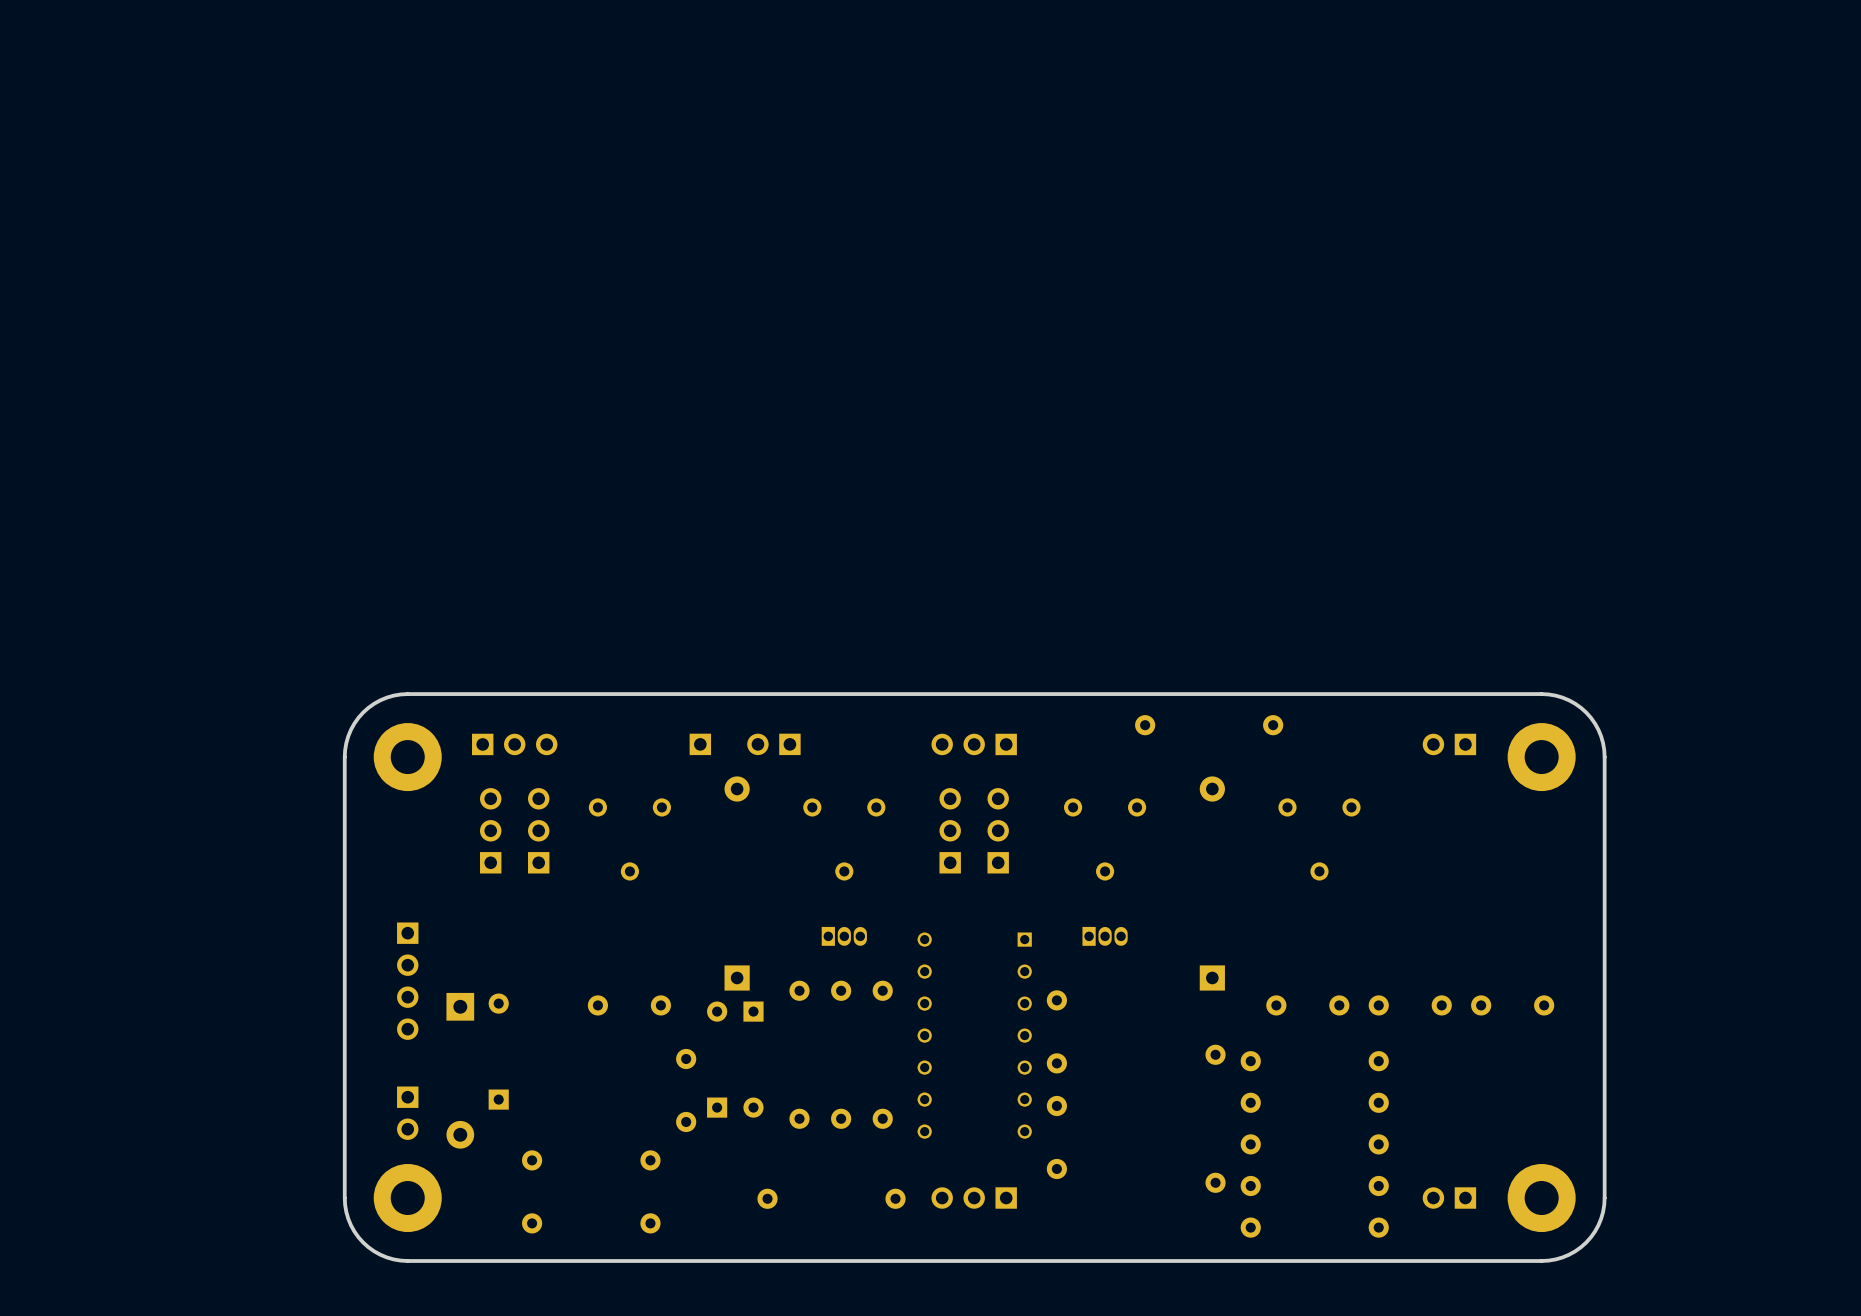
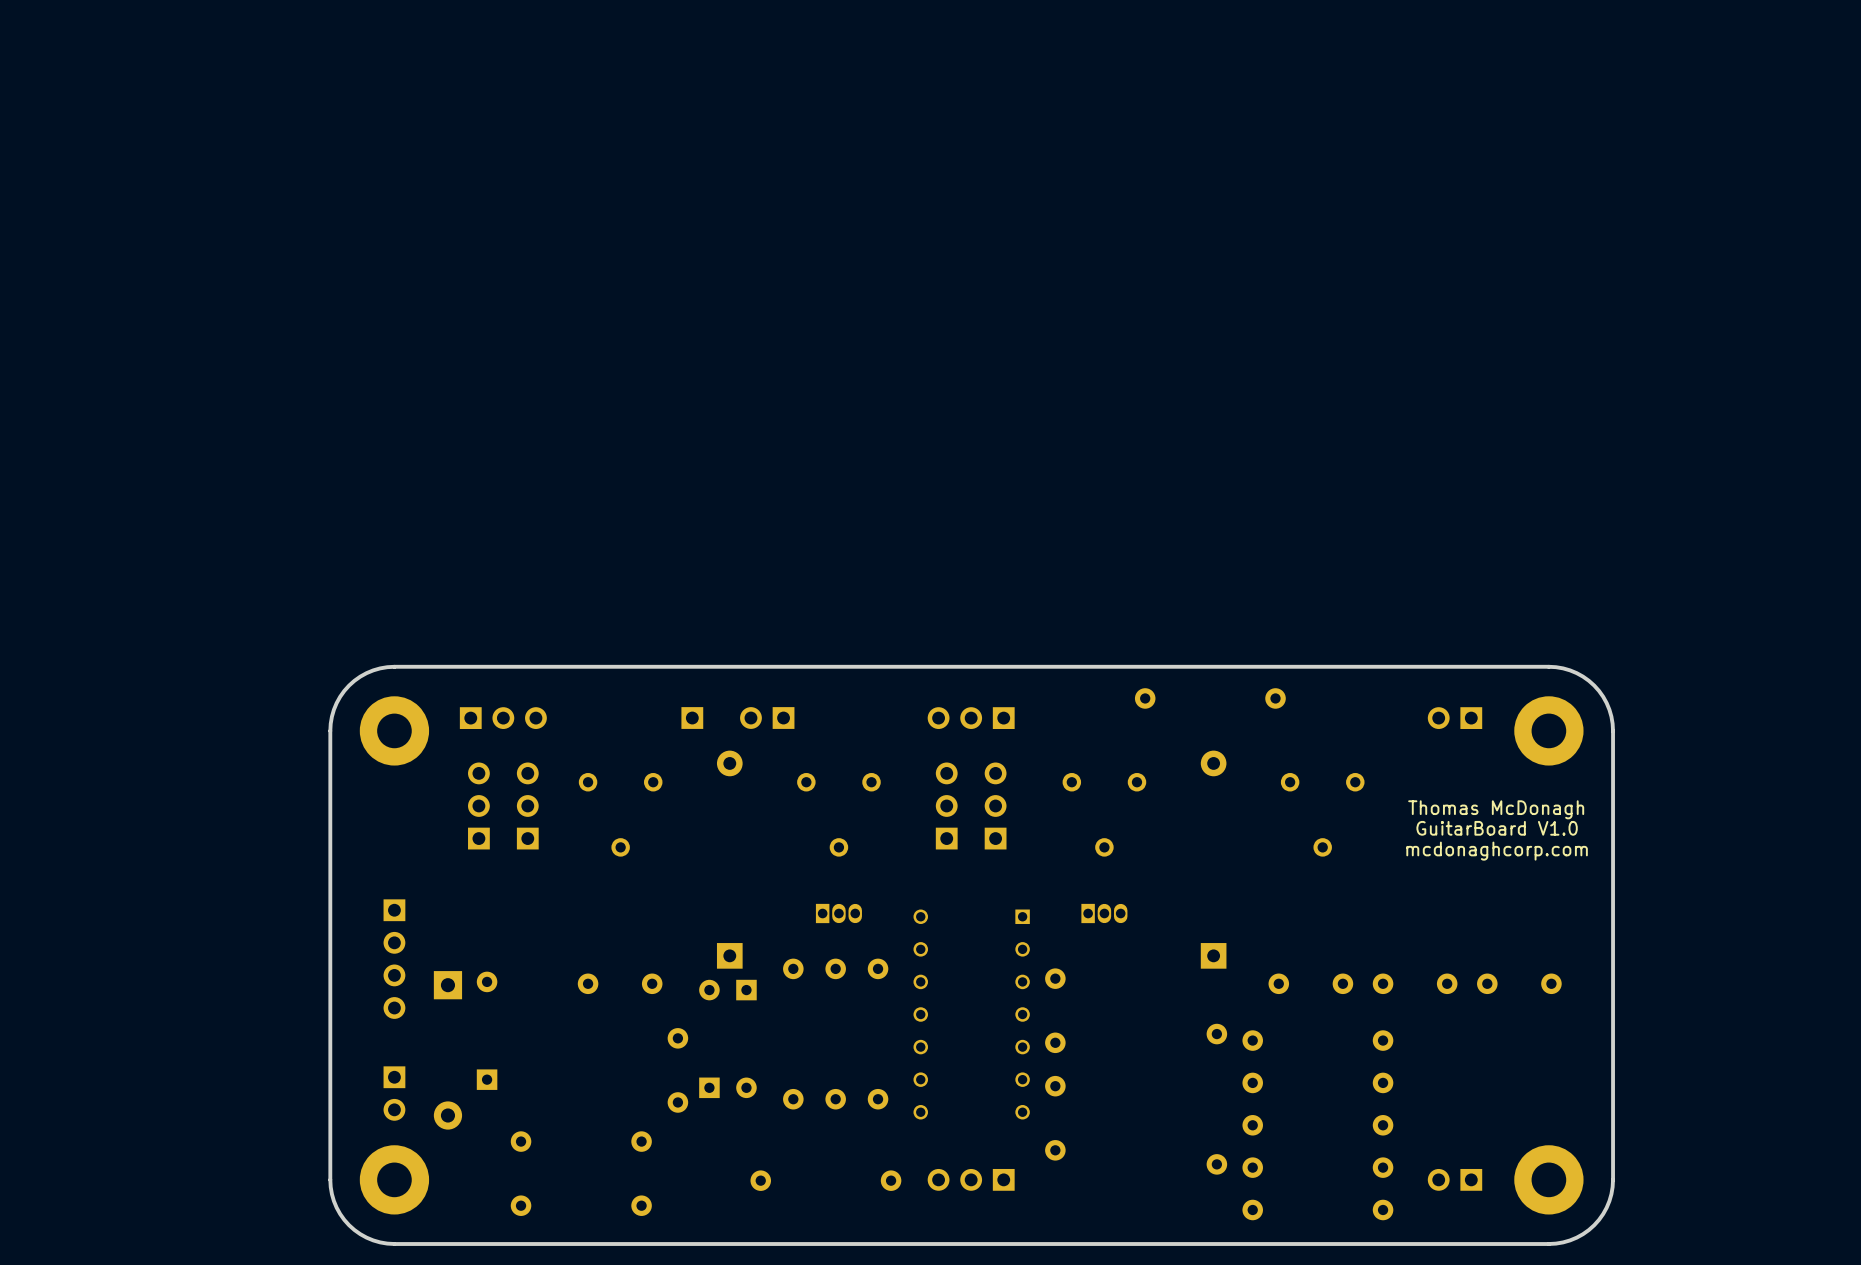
text: none -> Thomas McDonagh (1496, 809)
text: none -> GuitarBoard V1.0 (1497, 828)
text: none -> mcdonaghcorp.com (1497, 851)

